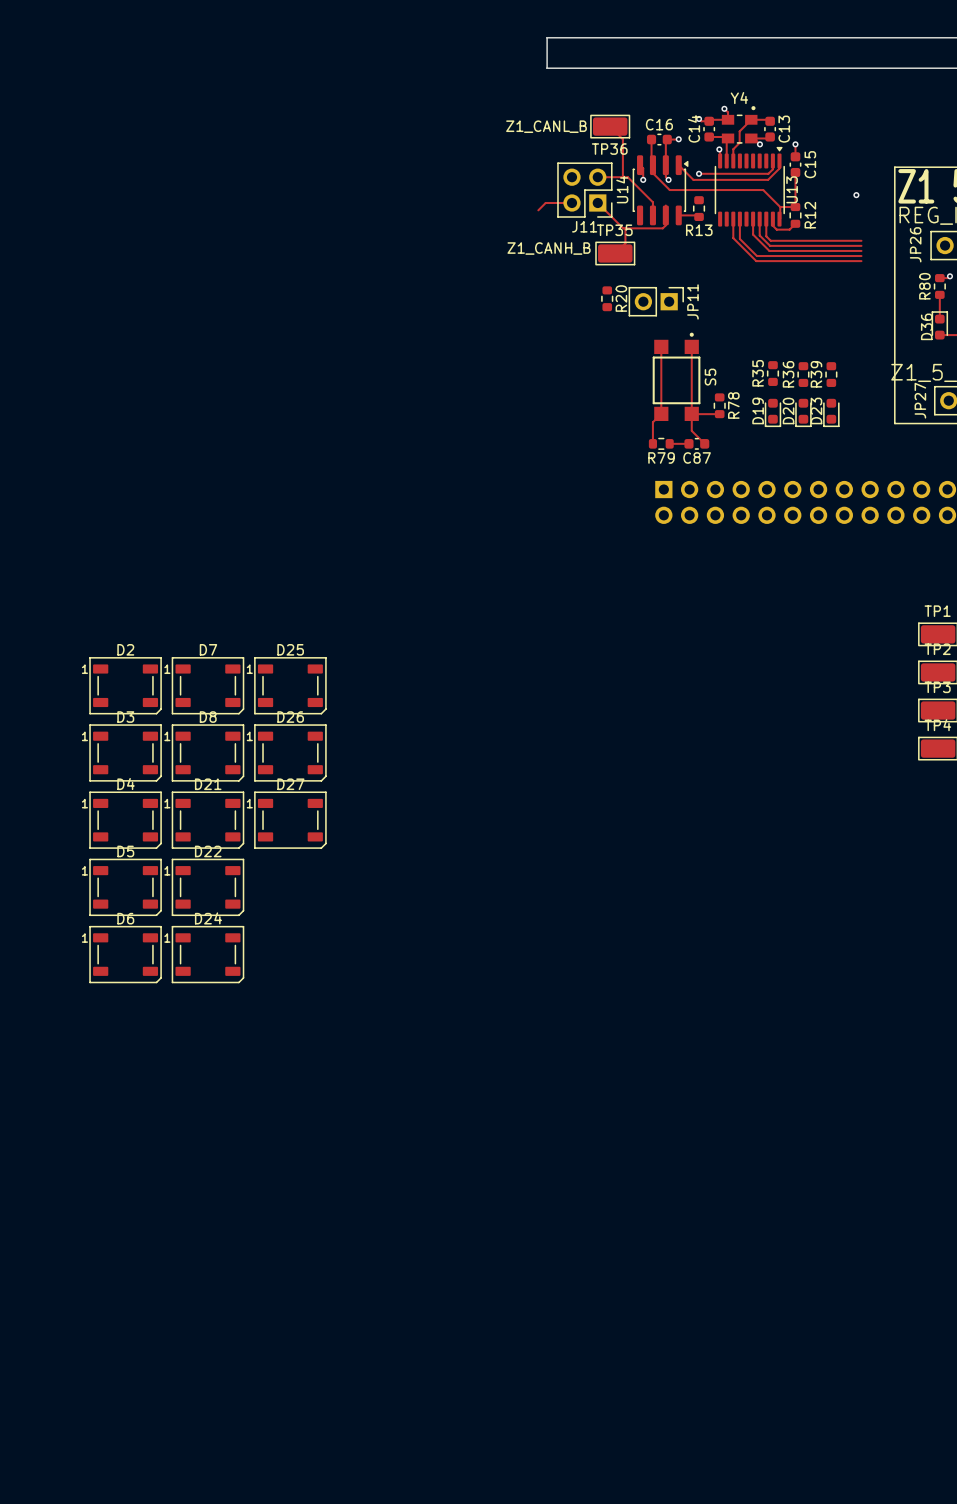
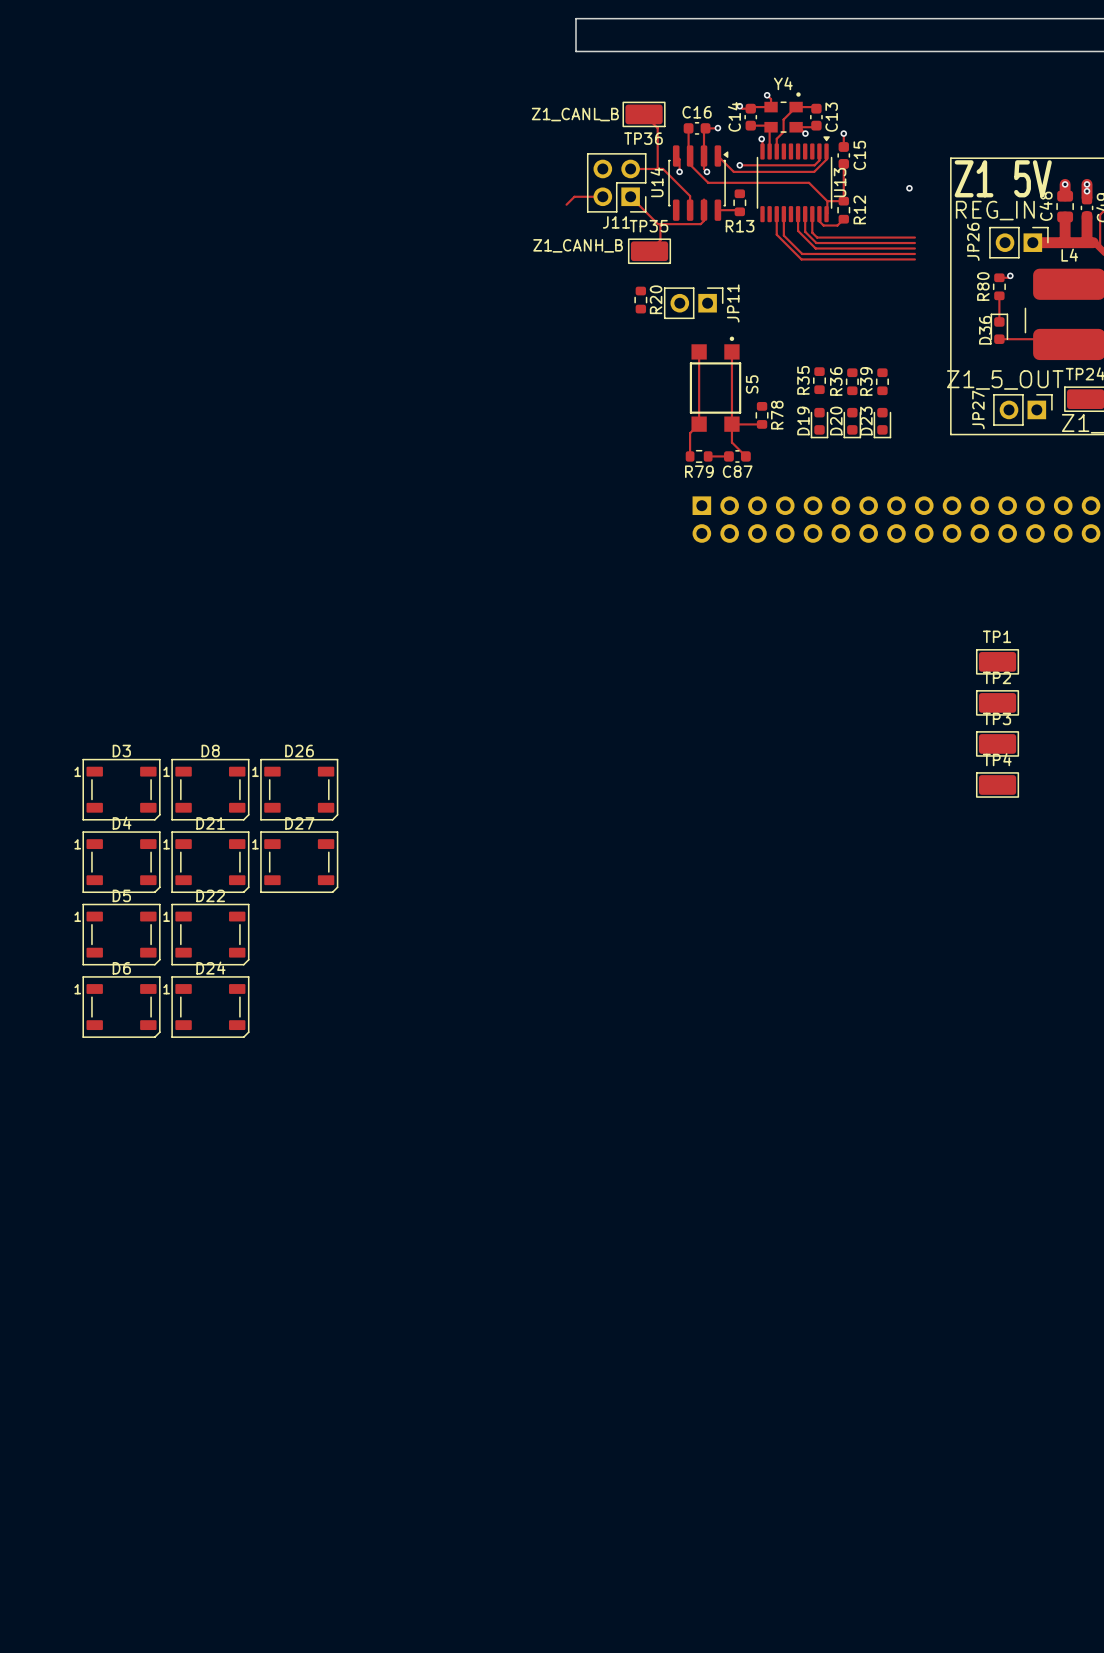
D2: (125, 685) -> none
D7: (207, 685) -> none
D25: (290, 685) -> none

